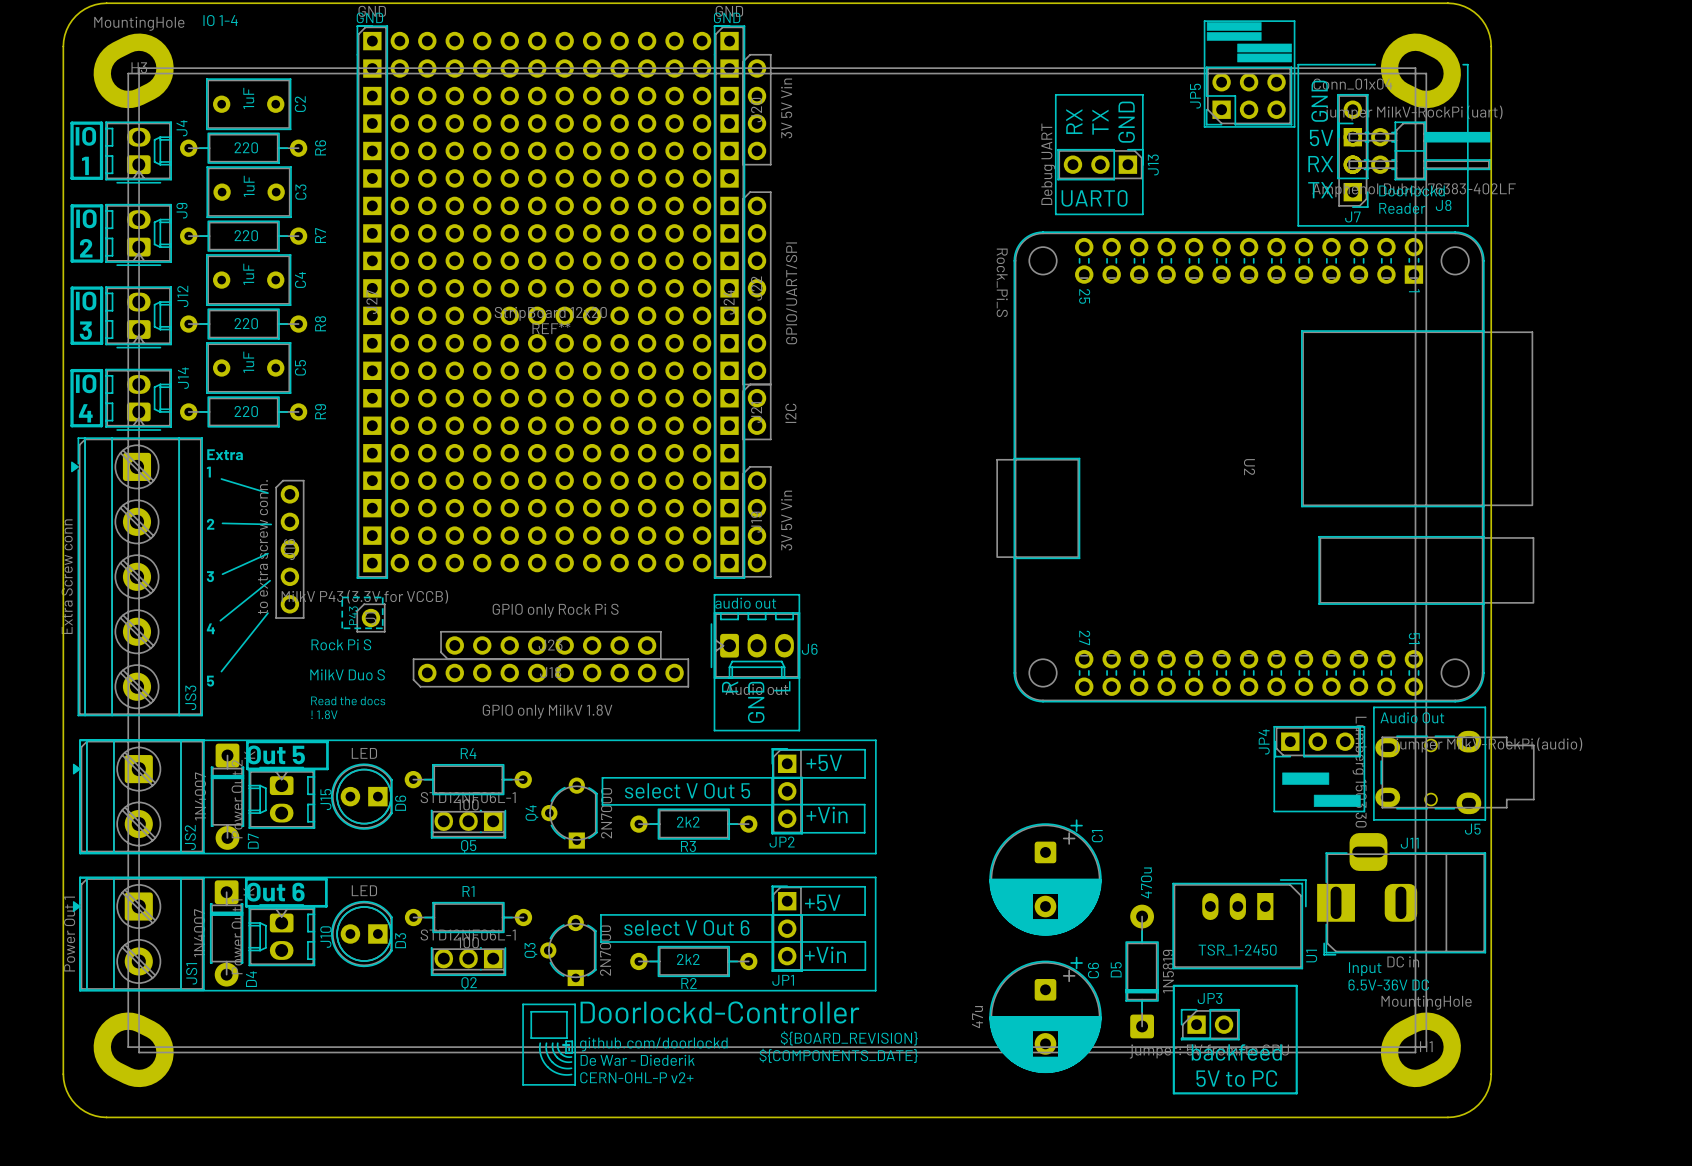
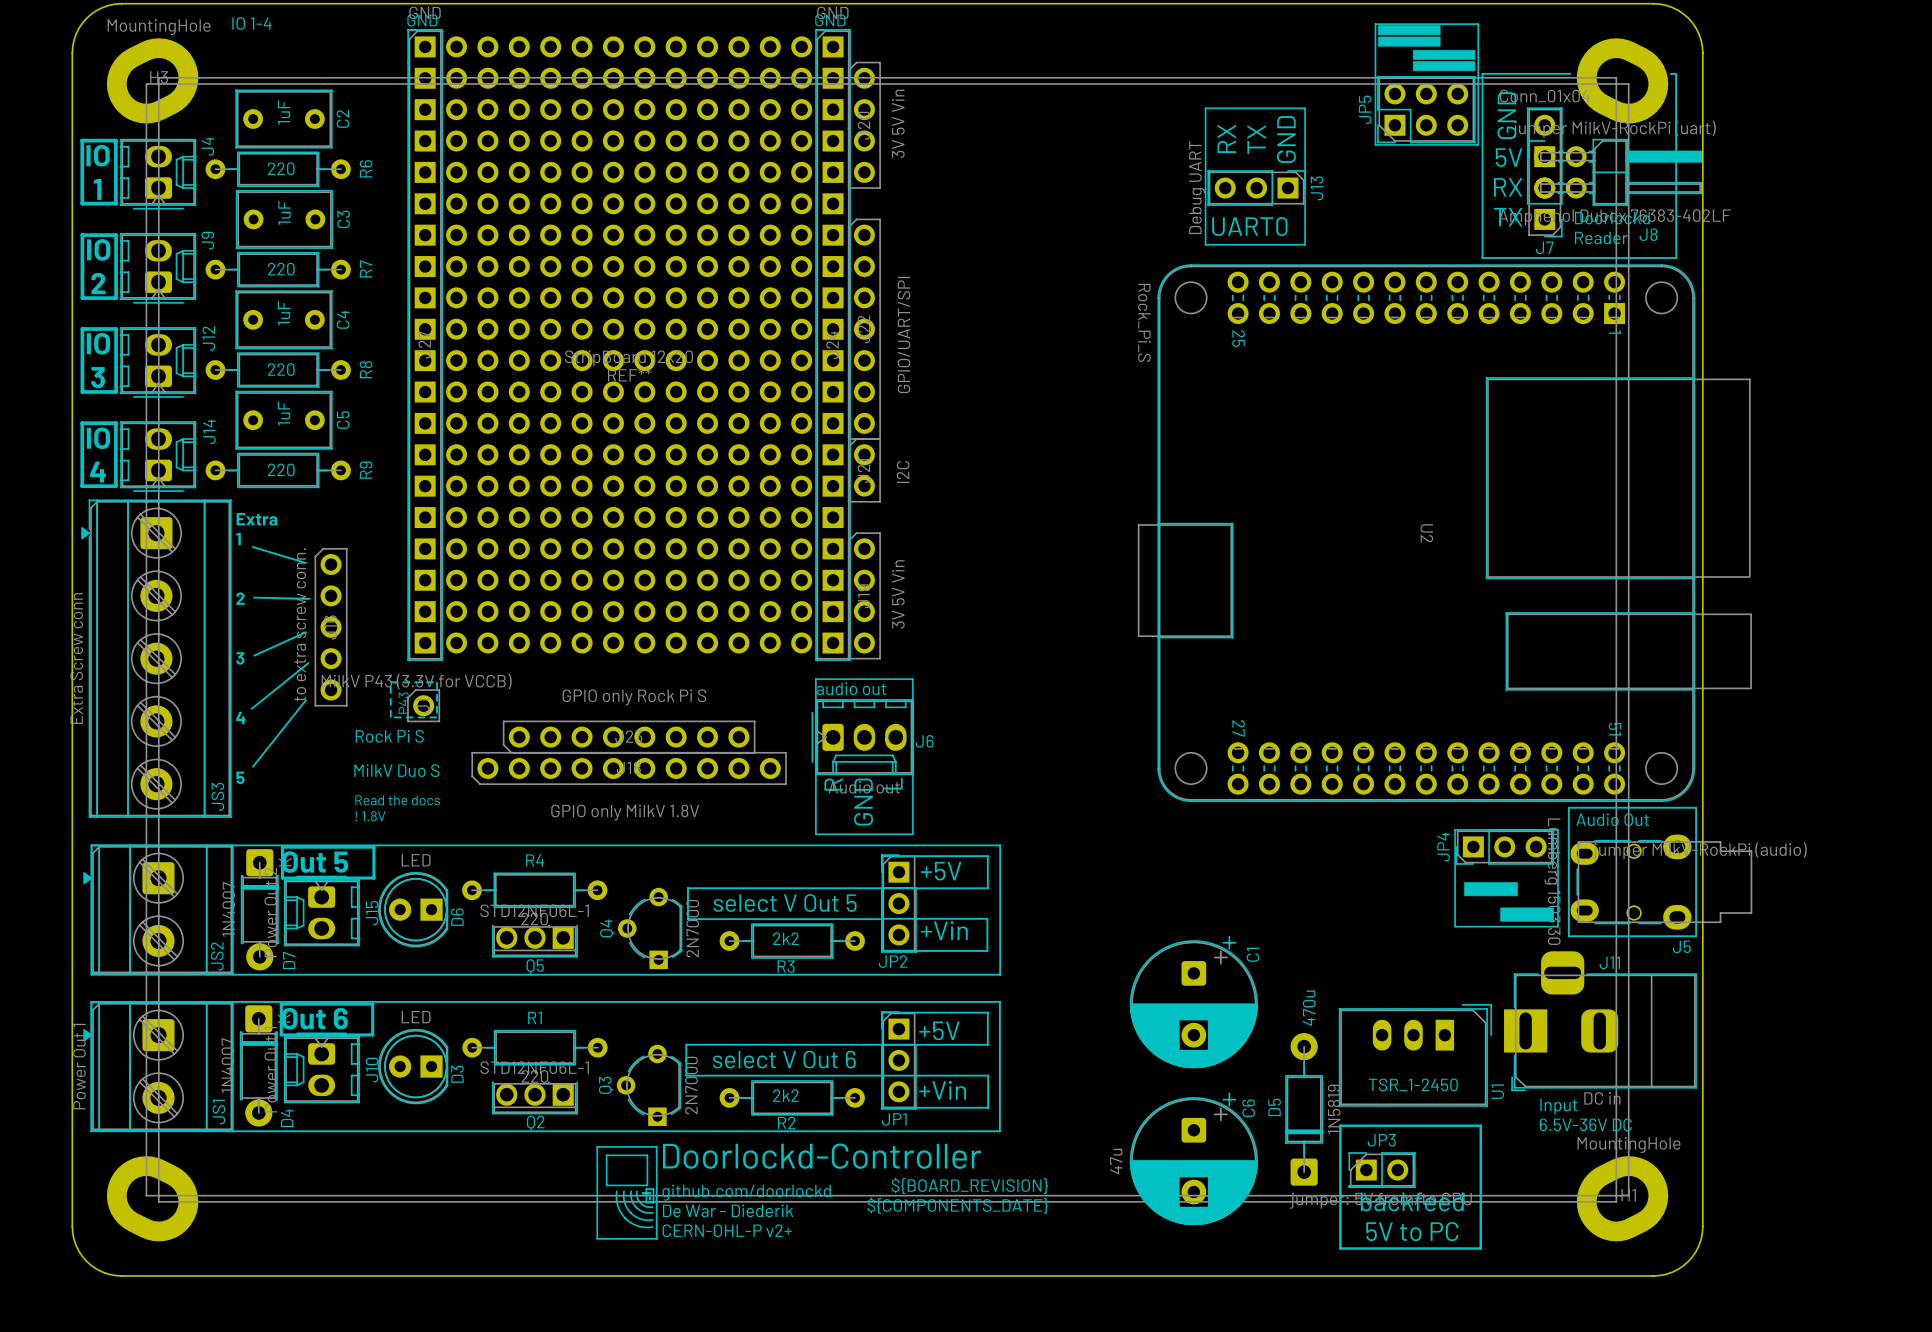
R4 value: 100 (468, 804) -> 220 (534, 919)
R1 value: 100 (468, 942) -> 220 (534, 1076)

